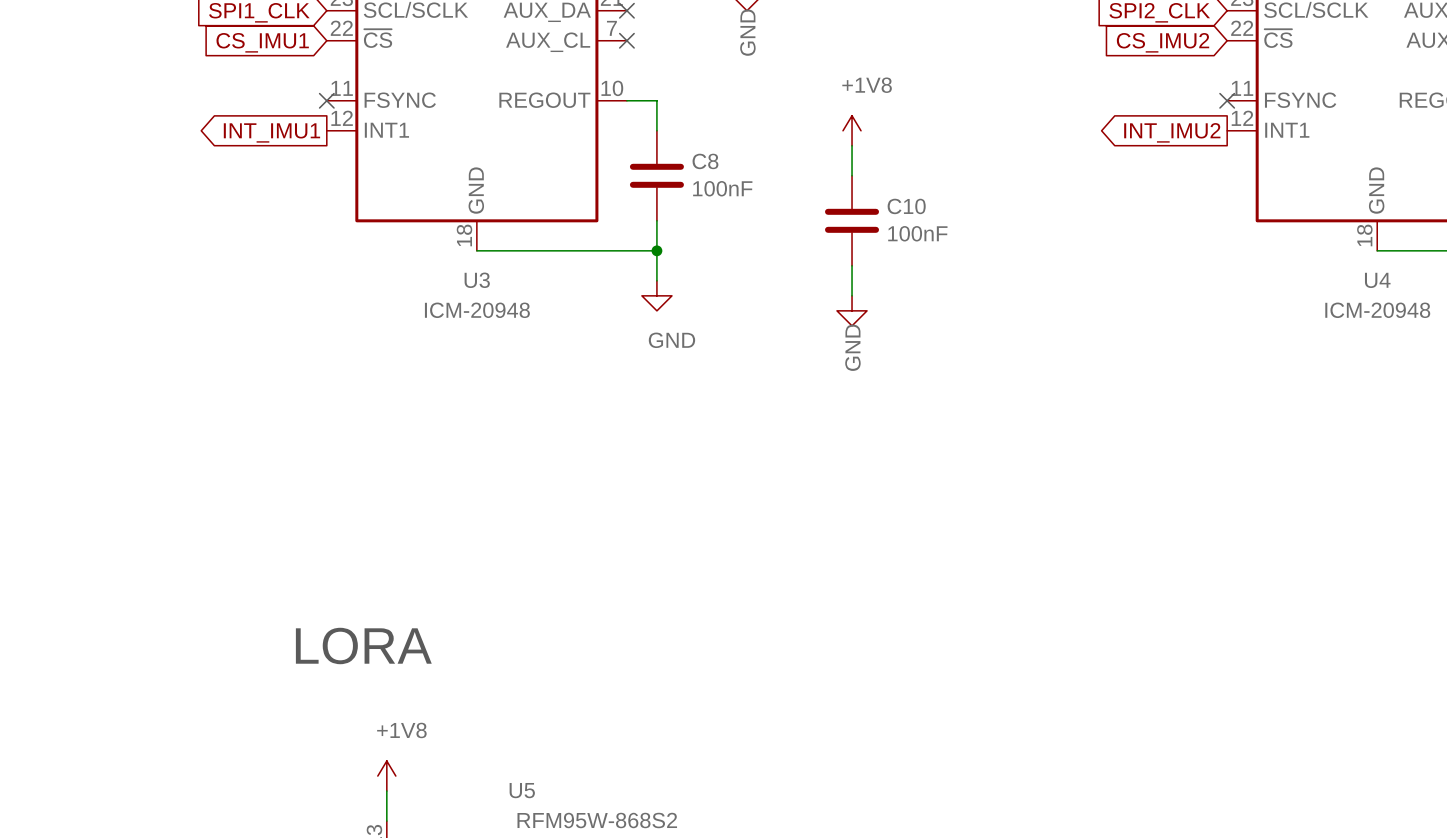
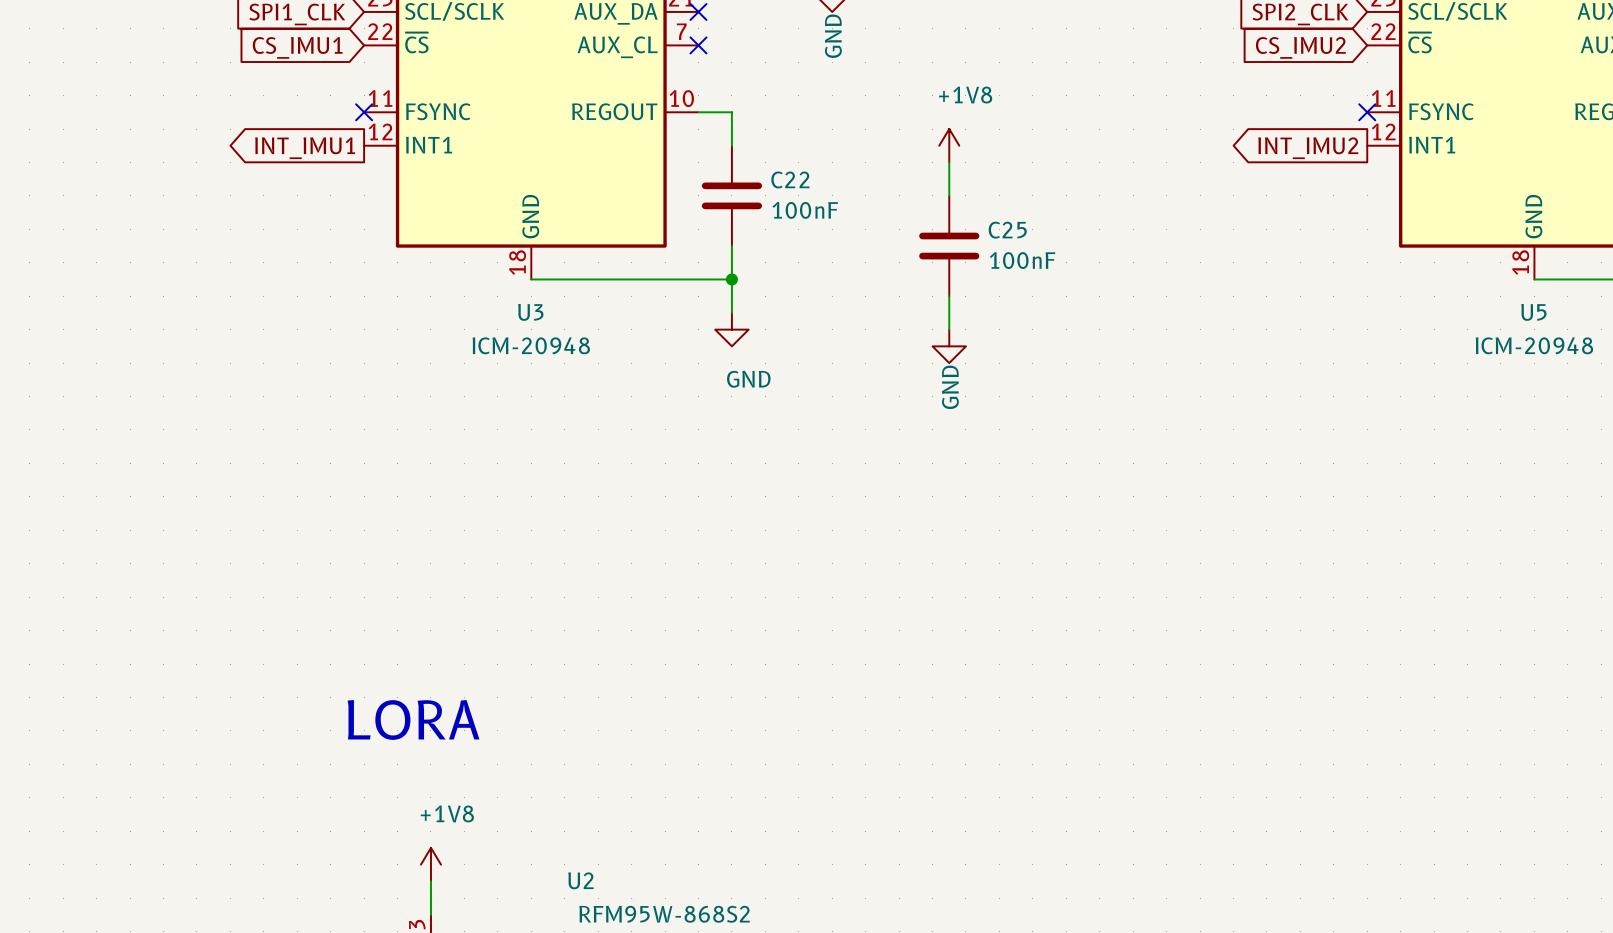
C8 name: C8 (705, 161) -> C22 (790, 179)
C10 name: C10 (906, 206) -> C25 (1007, 230)
U4 name: U4 (1377, 280) -> U5 (1533, 312)
U5 name: U5 (522, 790) -> U2 (580, 880)

